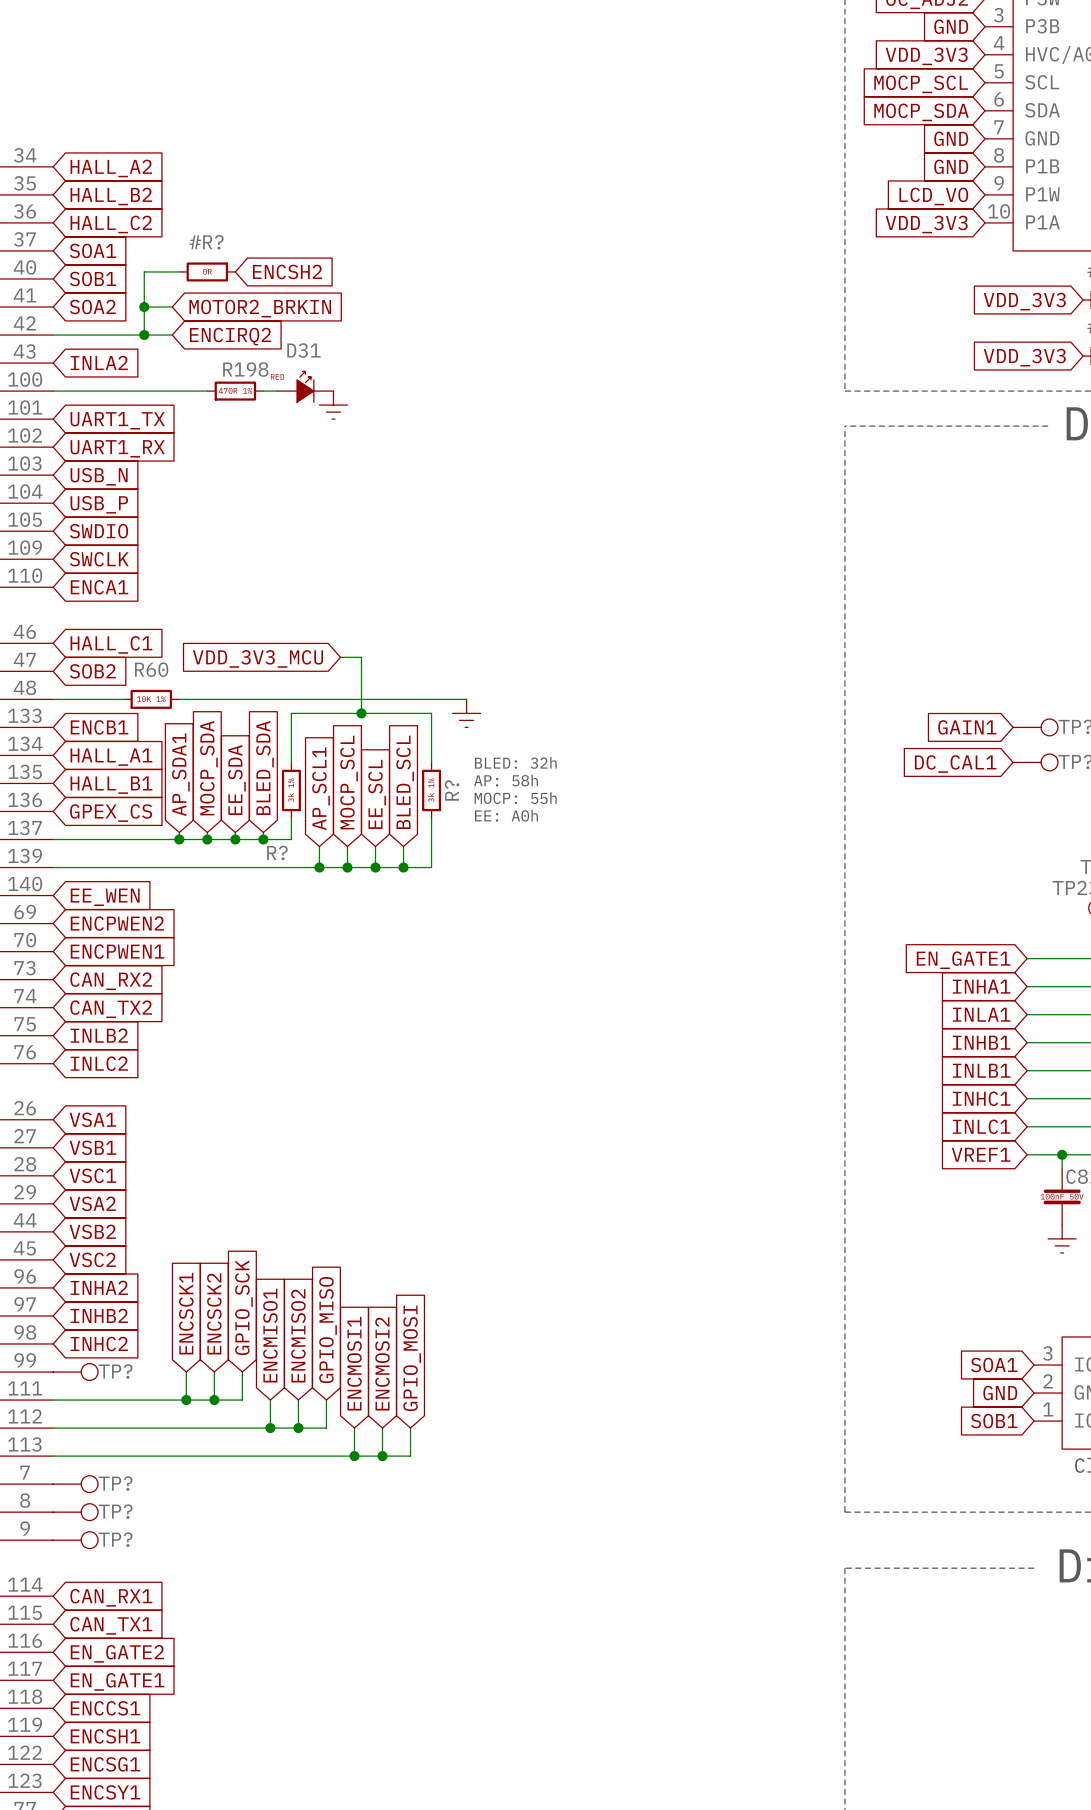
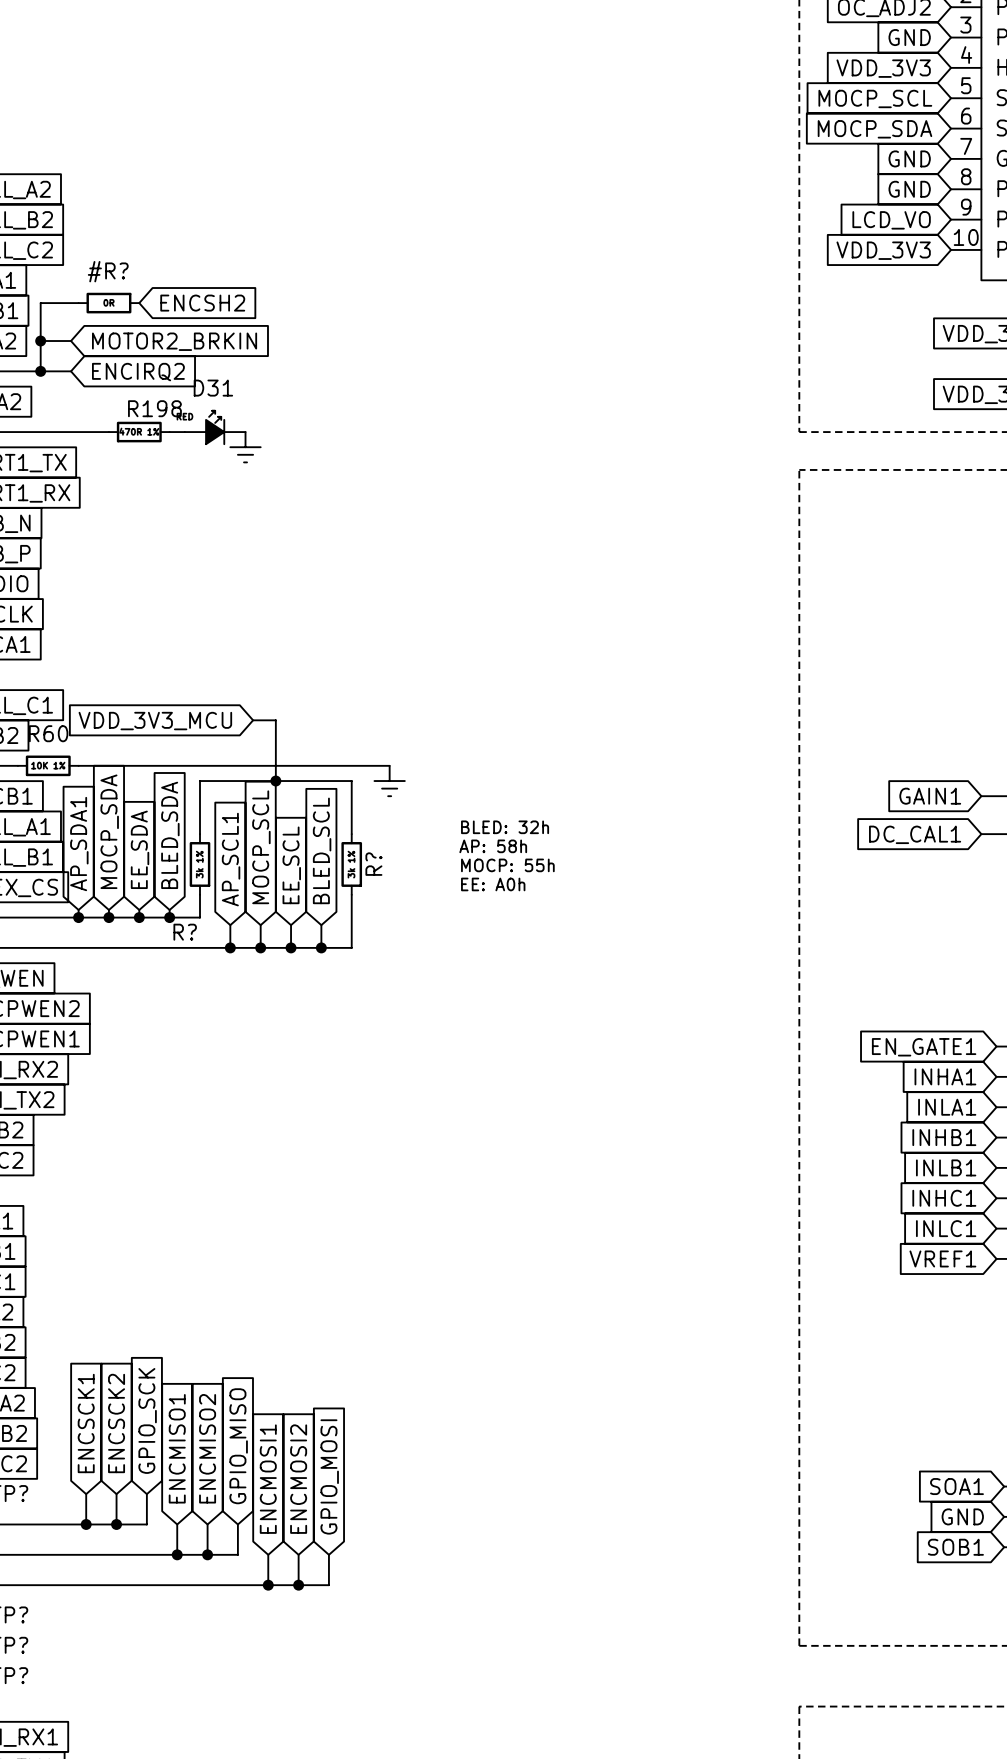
text position: BLED: 32h (515, 762) -> BLED: 32h (505, 827)
text position: AP: 58h (506, 780) -> AP: 58h (493, 846)
text position: MOCP: 55h (515, 798) -> MOCP: 55h (507, 865)
text position: EE: A0h (506, 815) -> EE: A0h (493, 884)

